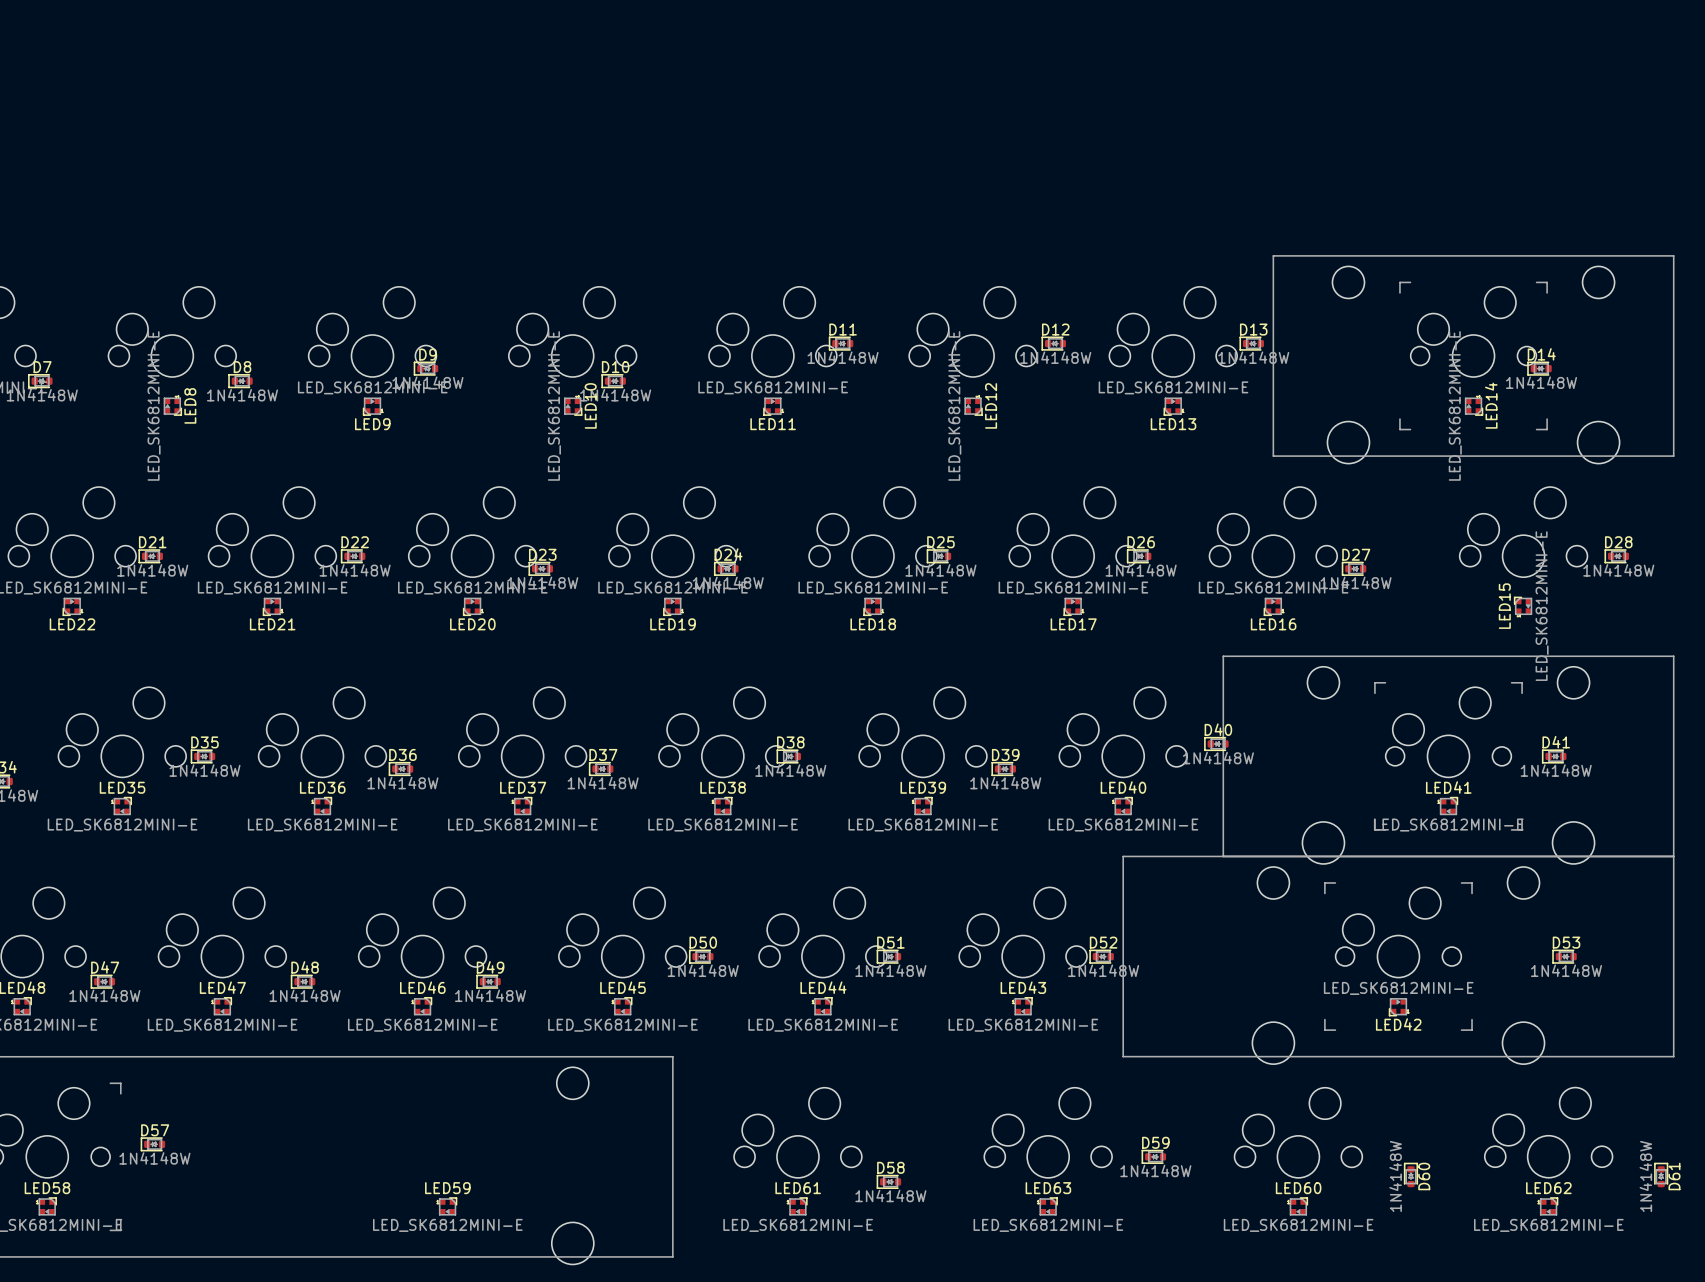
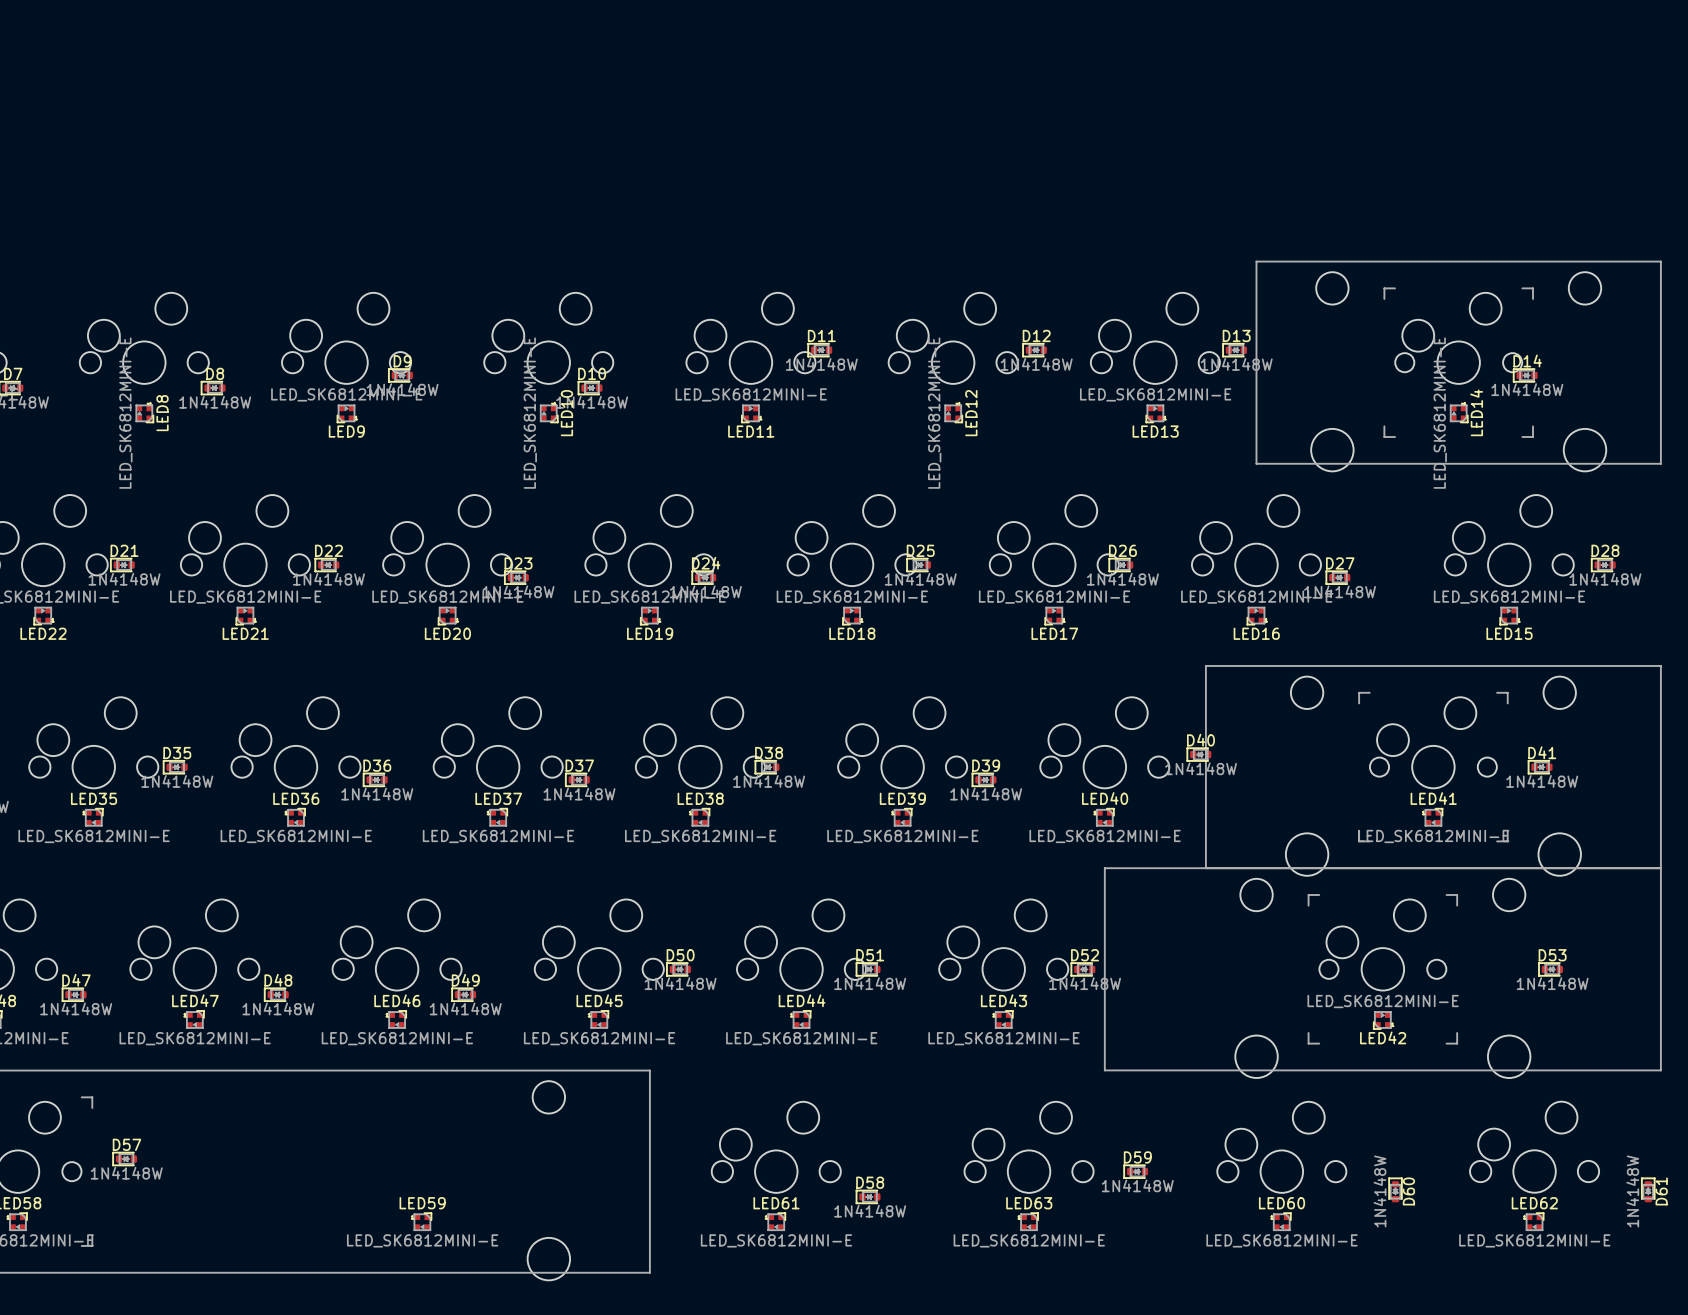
LED15 rotation: 0° (1523, 605) -> 90° counterclockwise (1508, 616)

